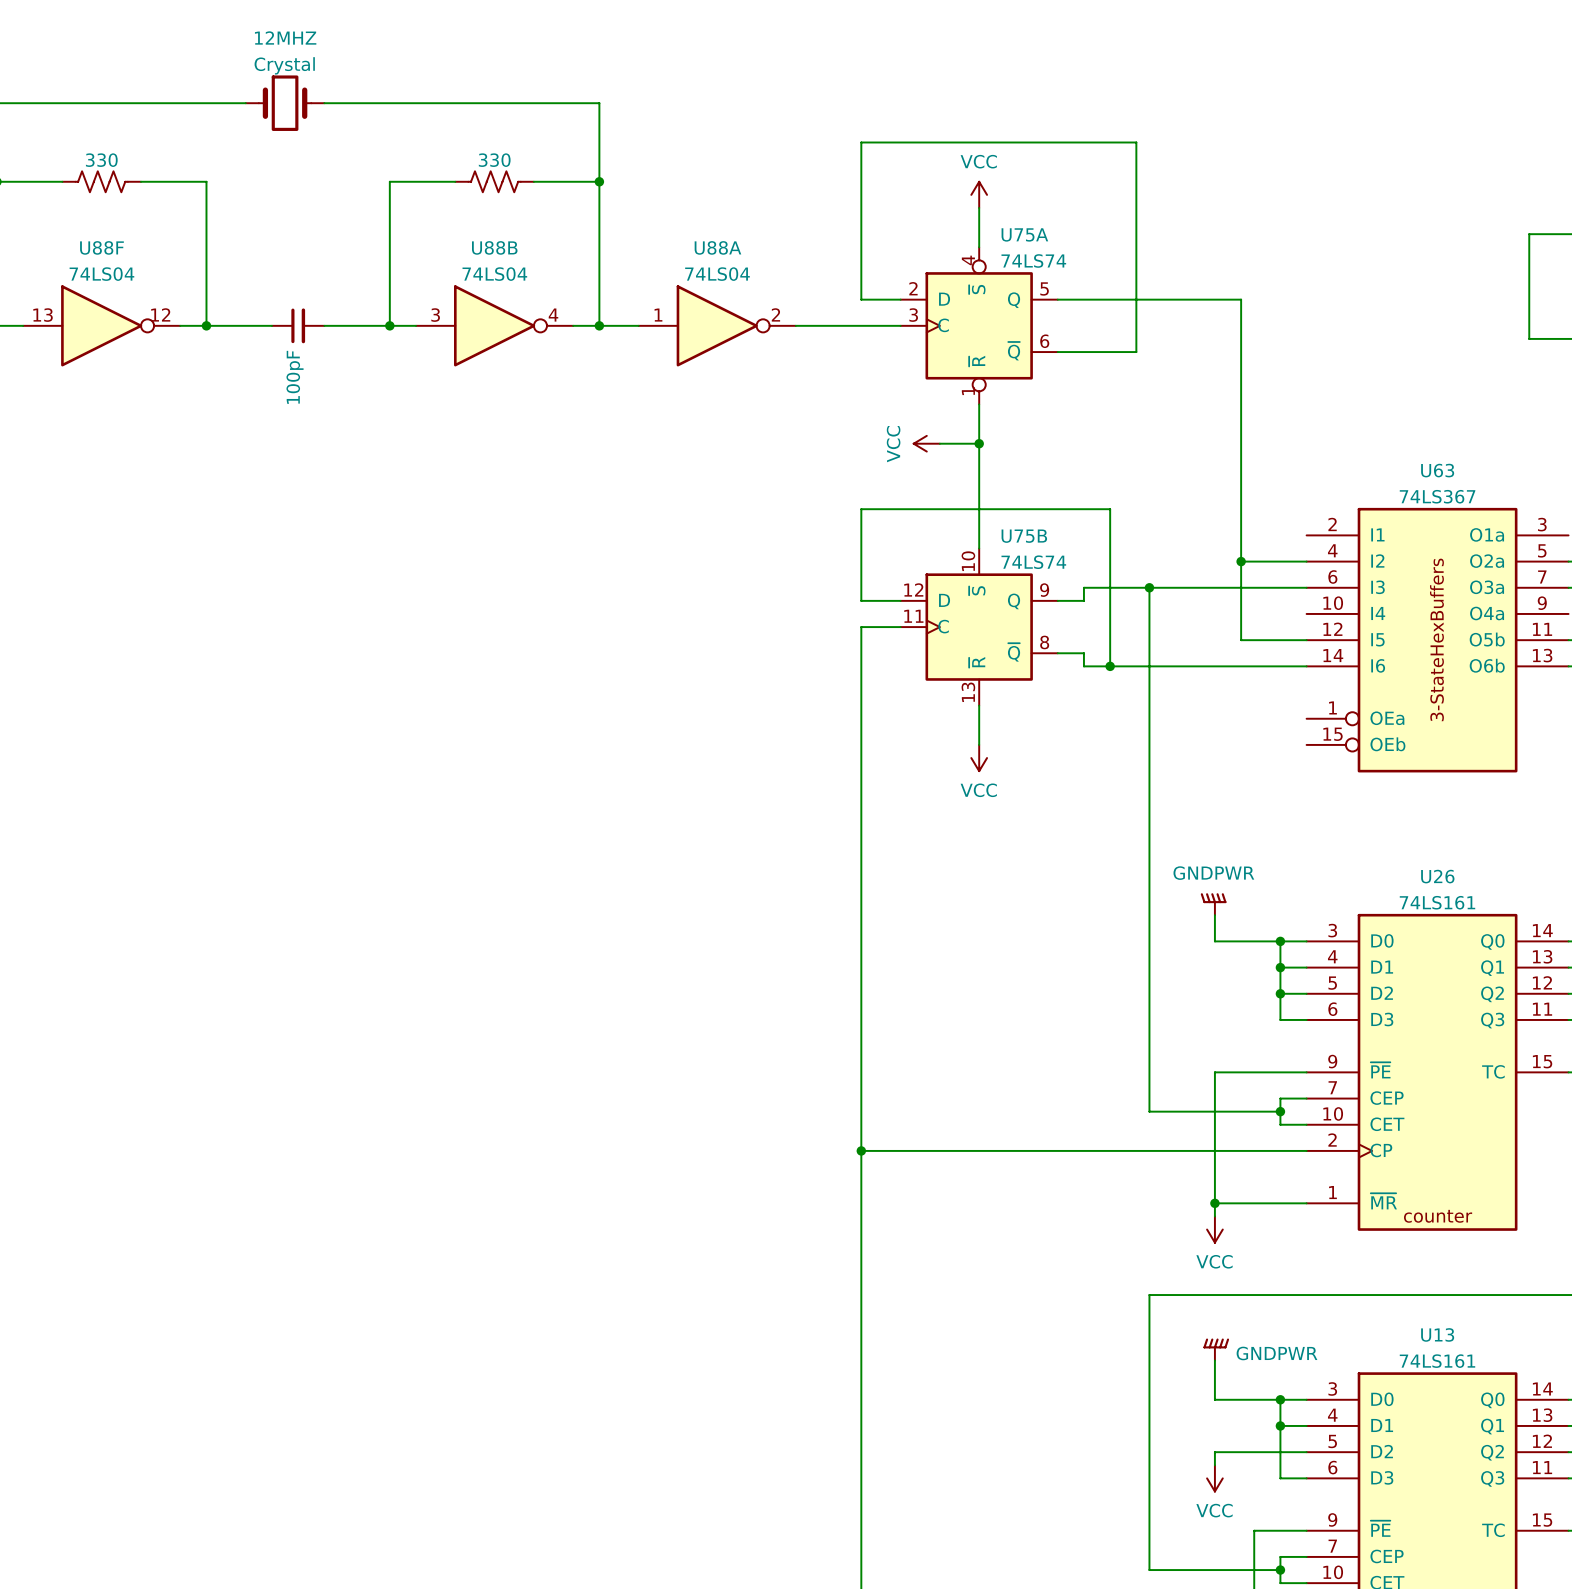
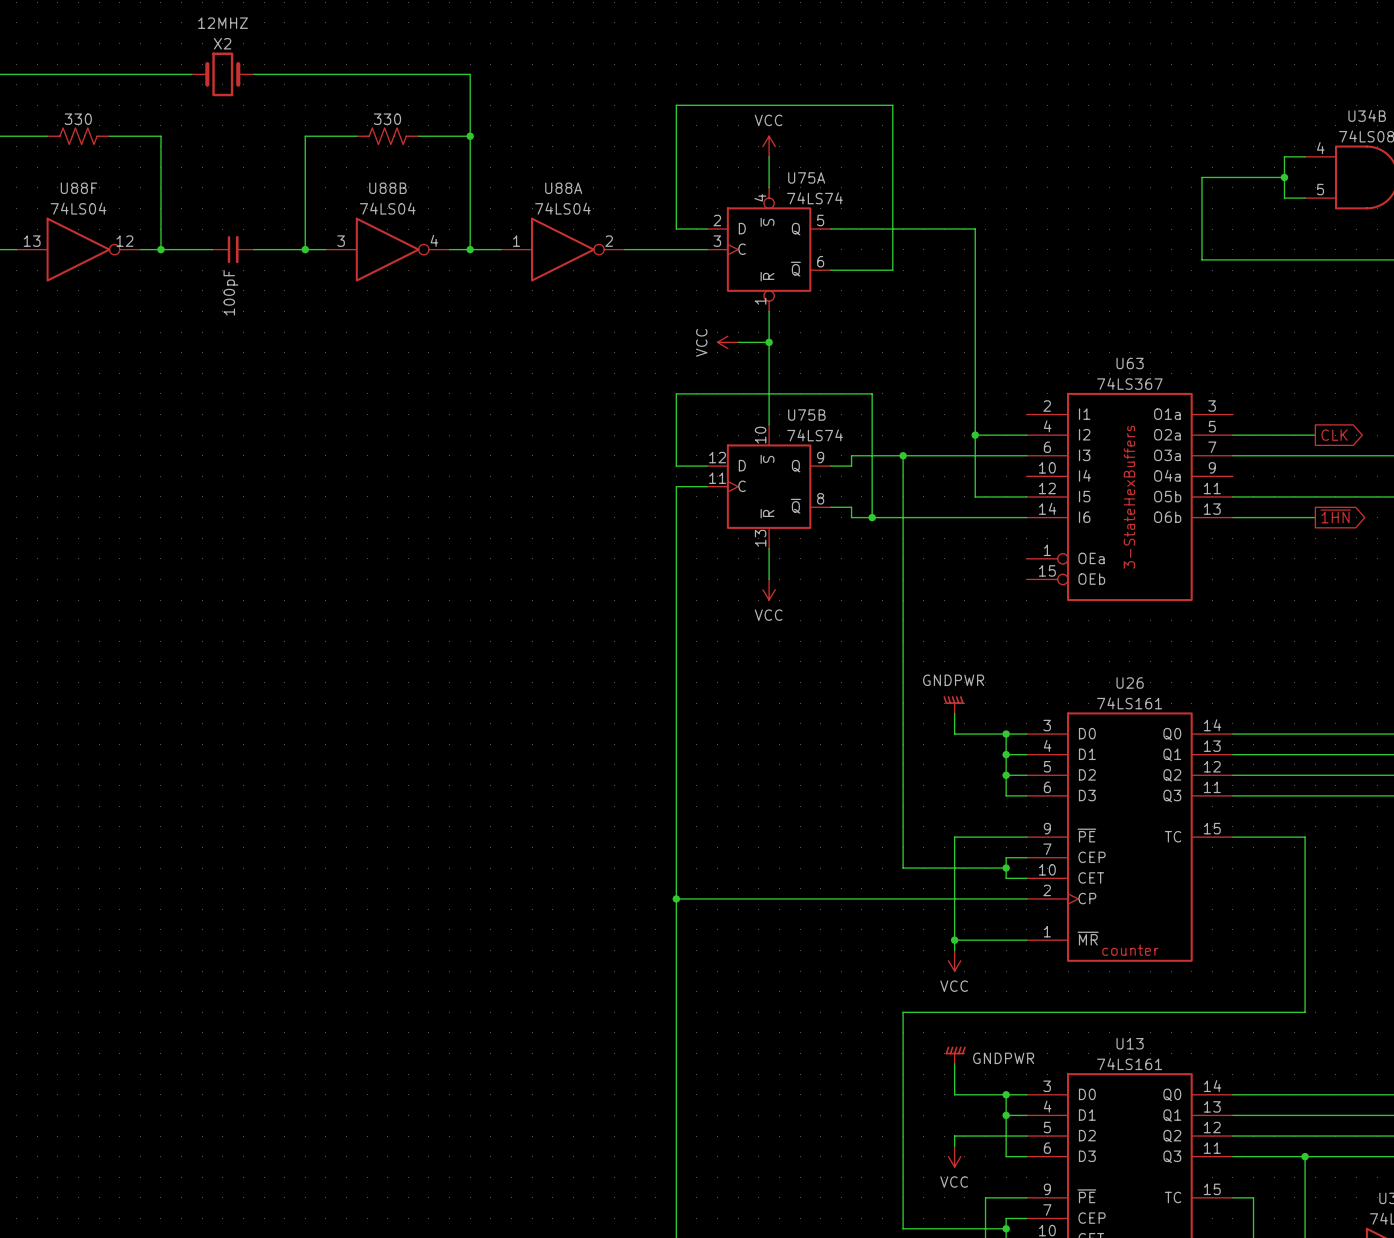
12MHZ value: Crystal (284, 65) -> X2 (222, 43)

